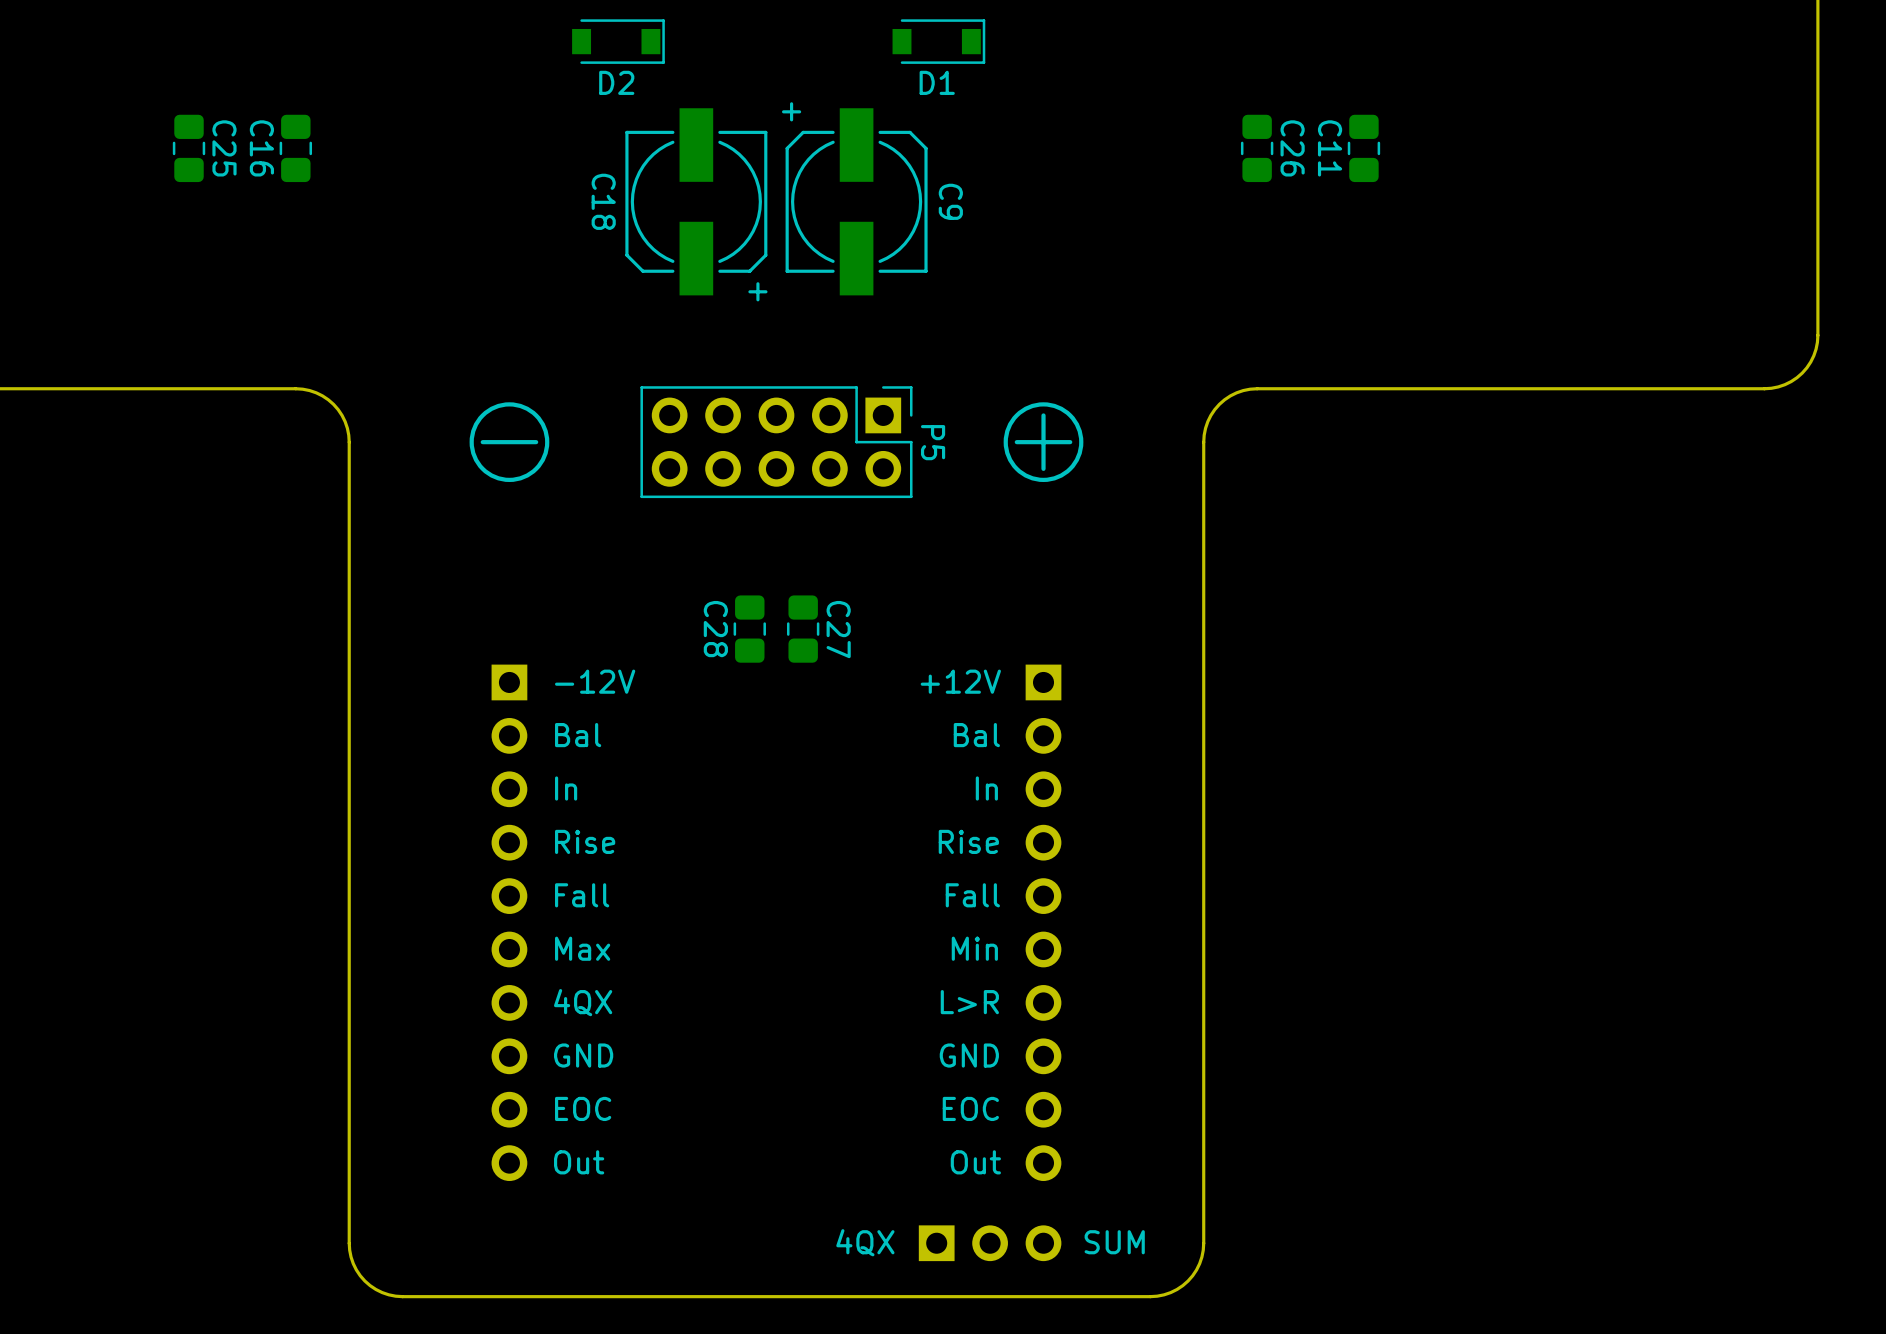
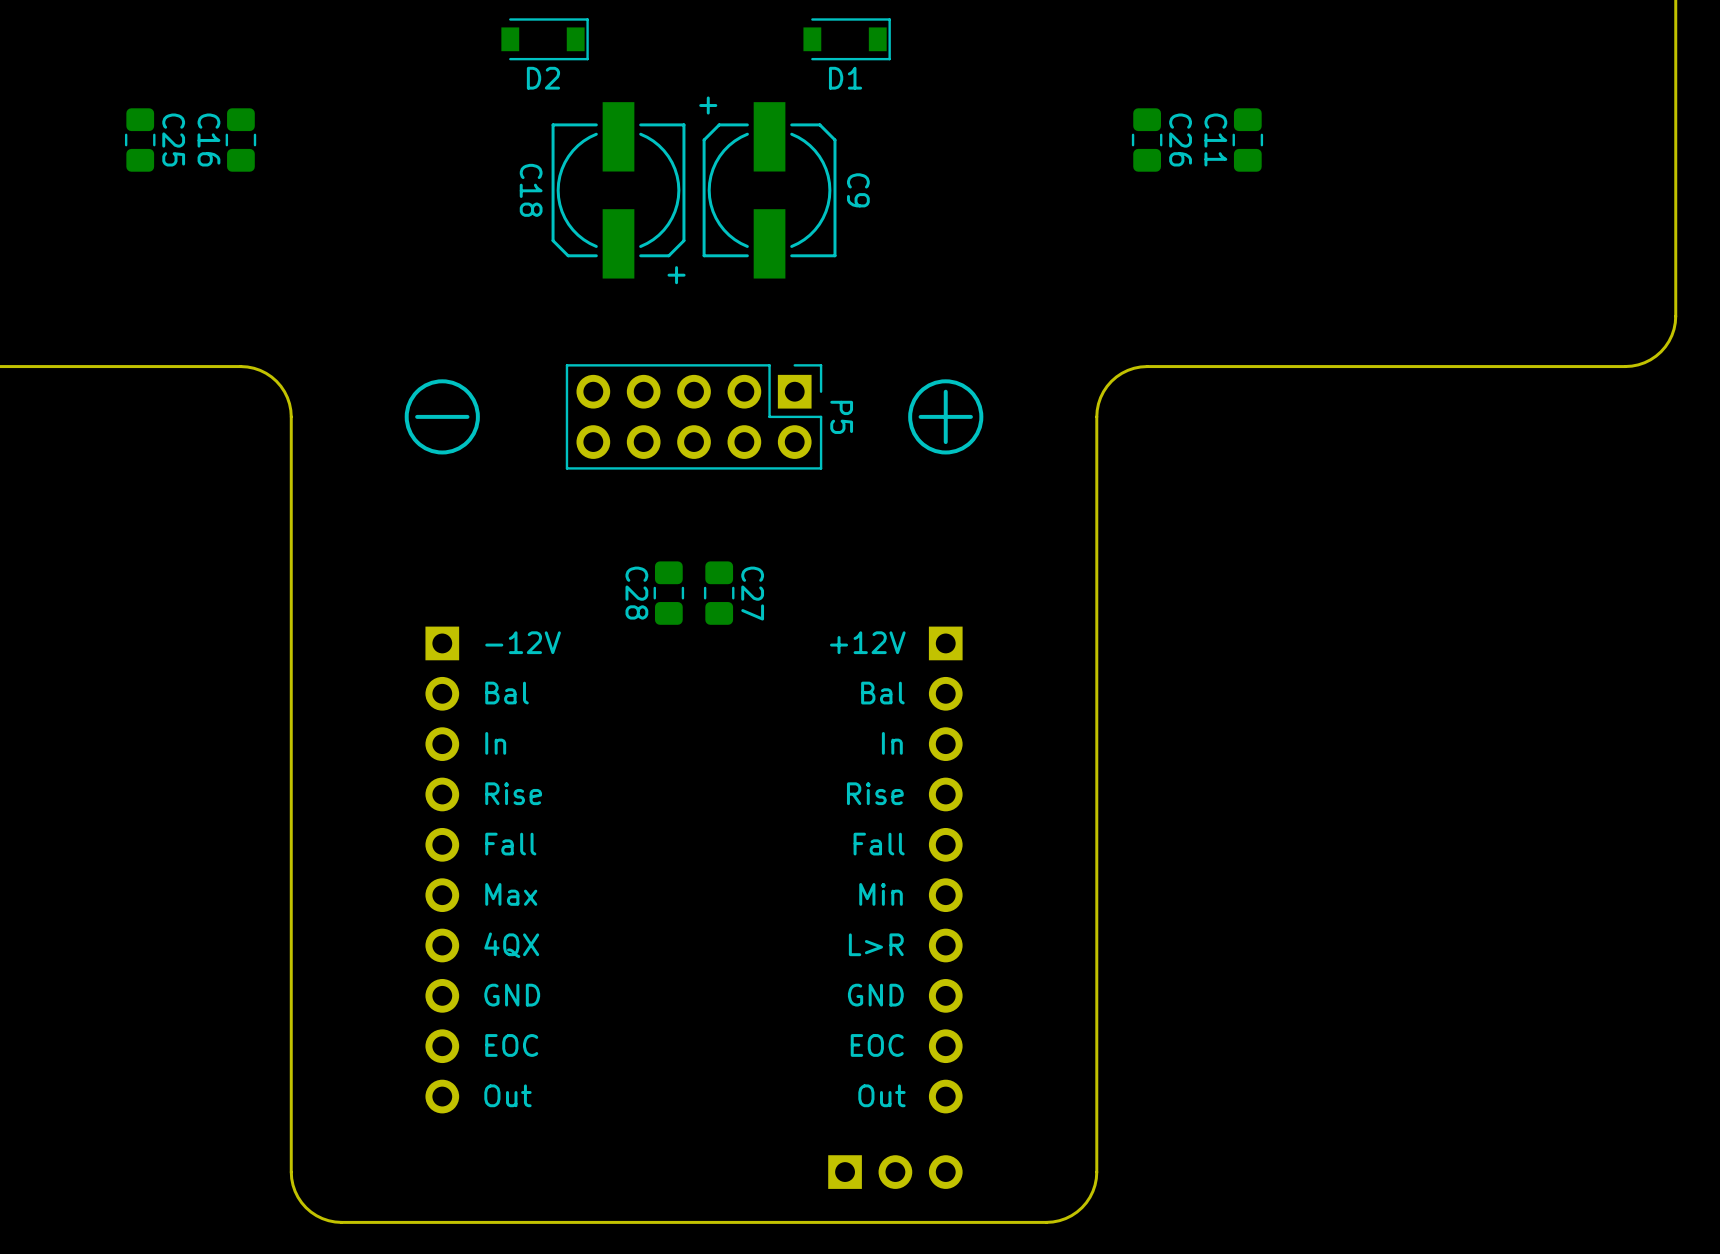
text: 4QX (865, 1242) -> none
text: SUM (1114, 1242) -> none

